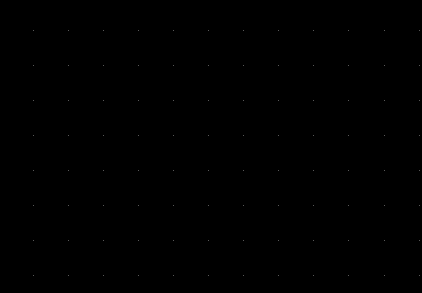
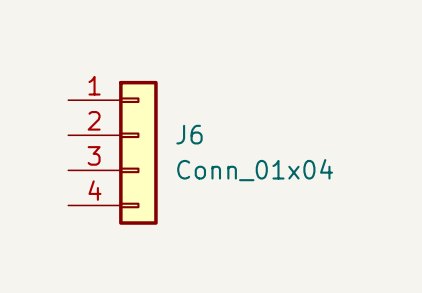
J6: none -> Conn_01x04 (112, 152)

